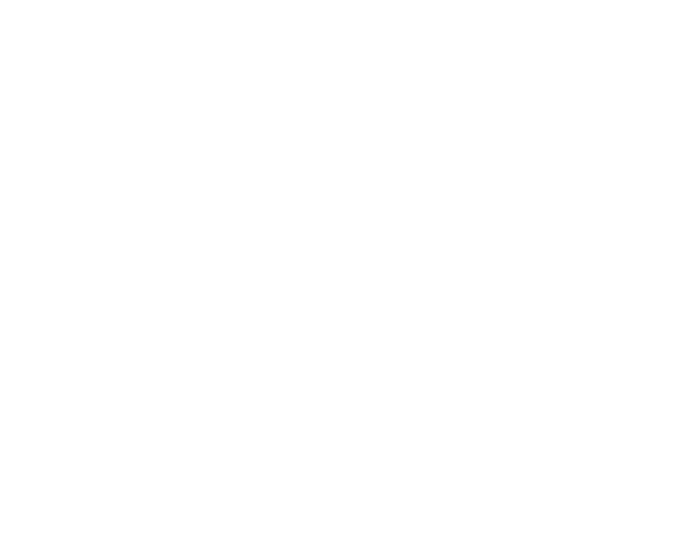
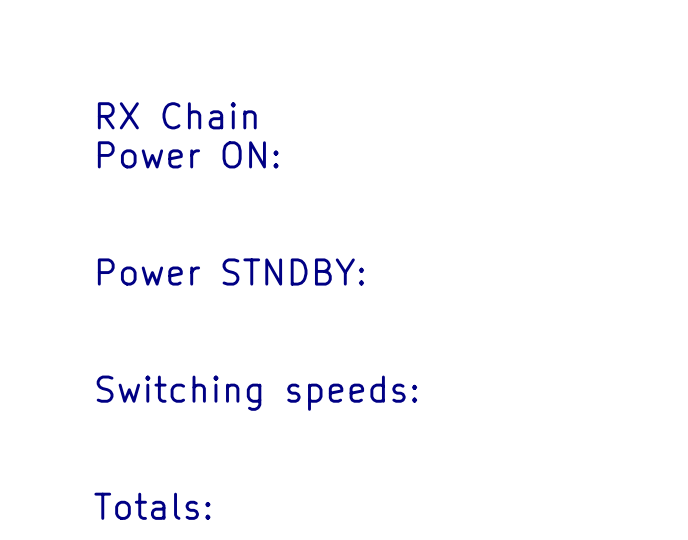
text: none -> RX Chain (177, 115)
text: none -> Power ON: (188, 154)
text: none -> Power STNDBY: (230, 272)
text: none -> Switching speeds: (256, 393)
text: none -> Totals: (152, 506)

